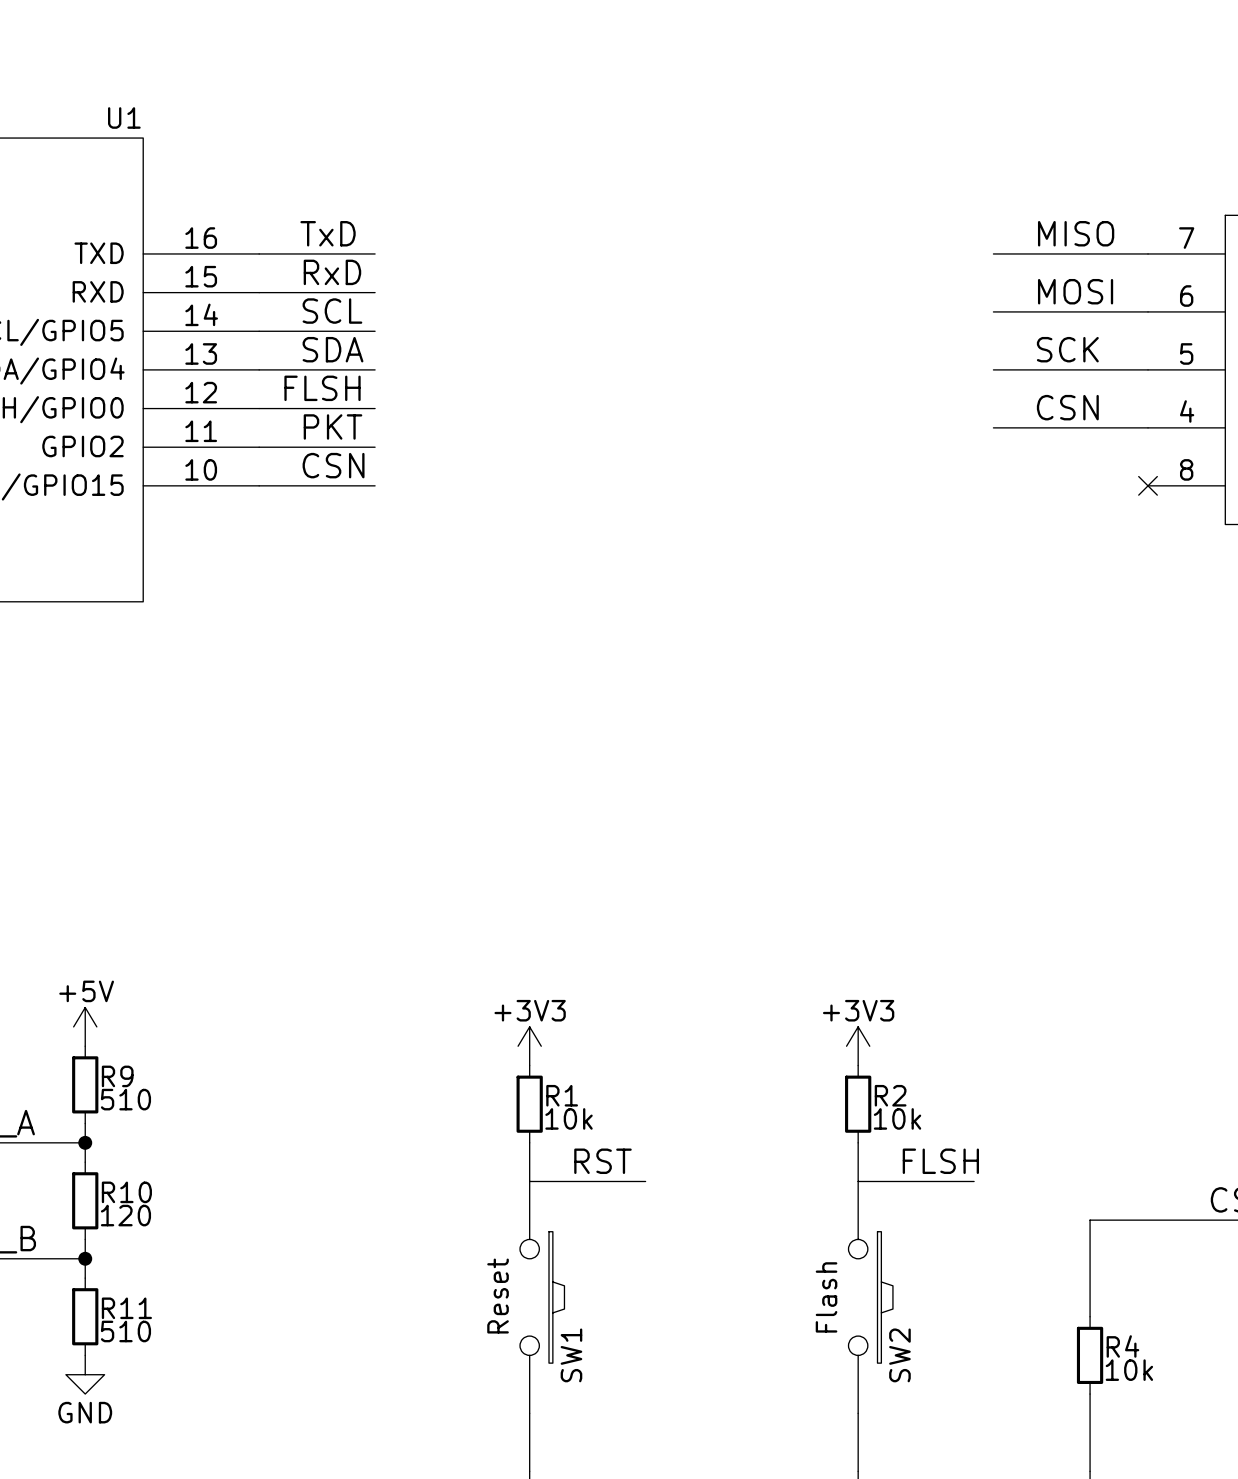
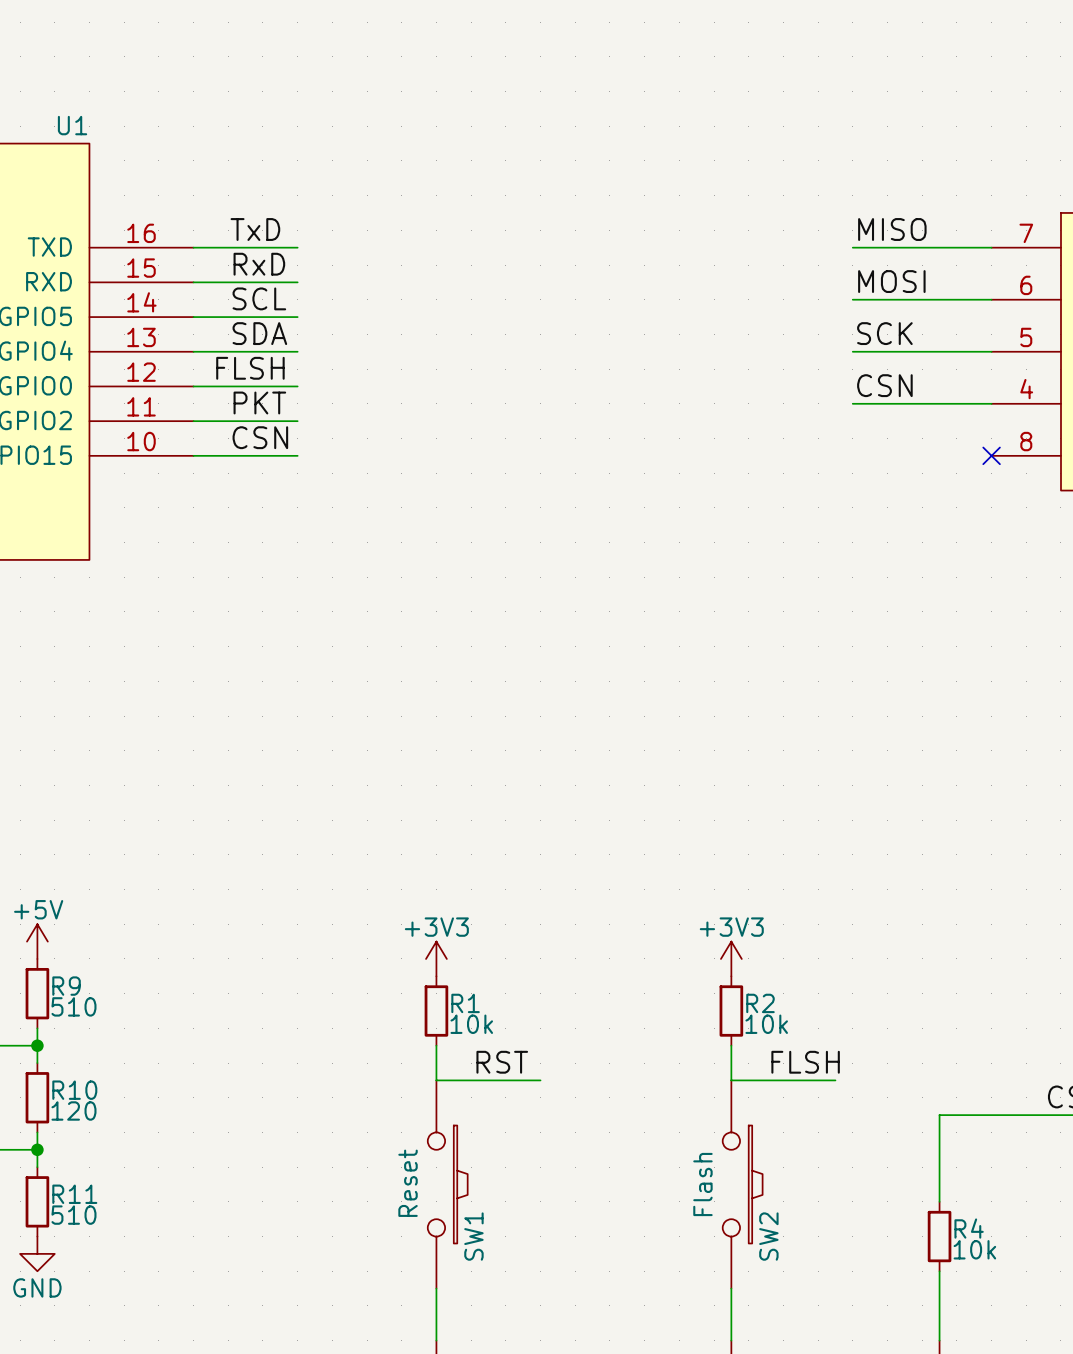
label position: MISO (1076, 233) -> MISO (892, 229)
label position: MOSI (1075, 291) -> MOSI (891, 281)
label position: SCK (1067, 349) -> SCK (884, 333)
label position: CSN (1067, 407) -> CSN (884, 385)

